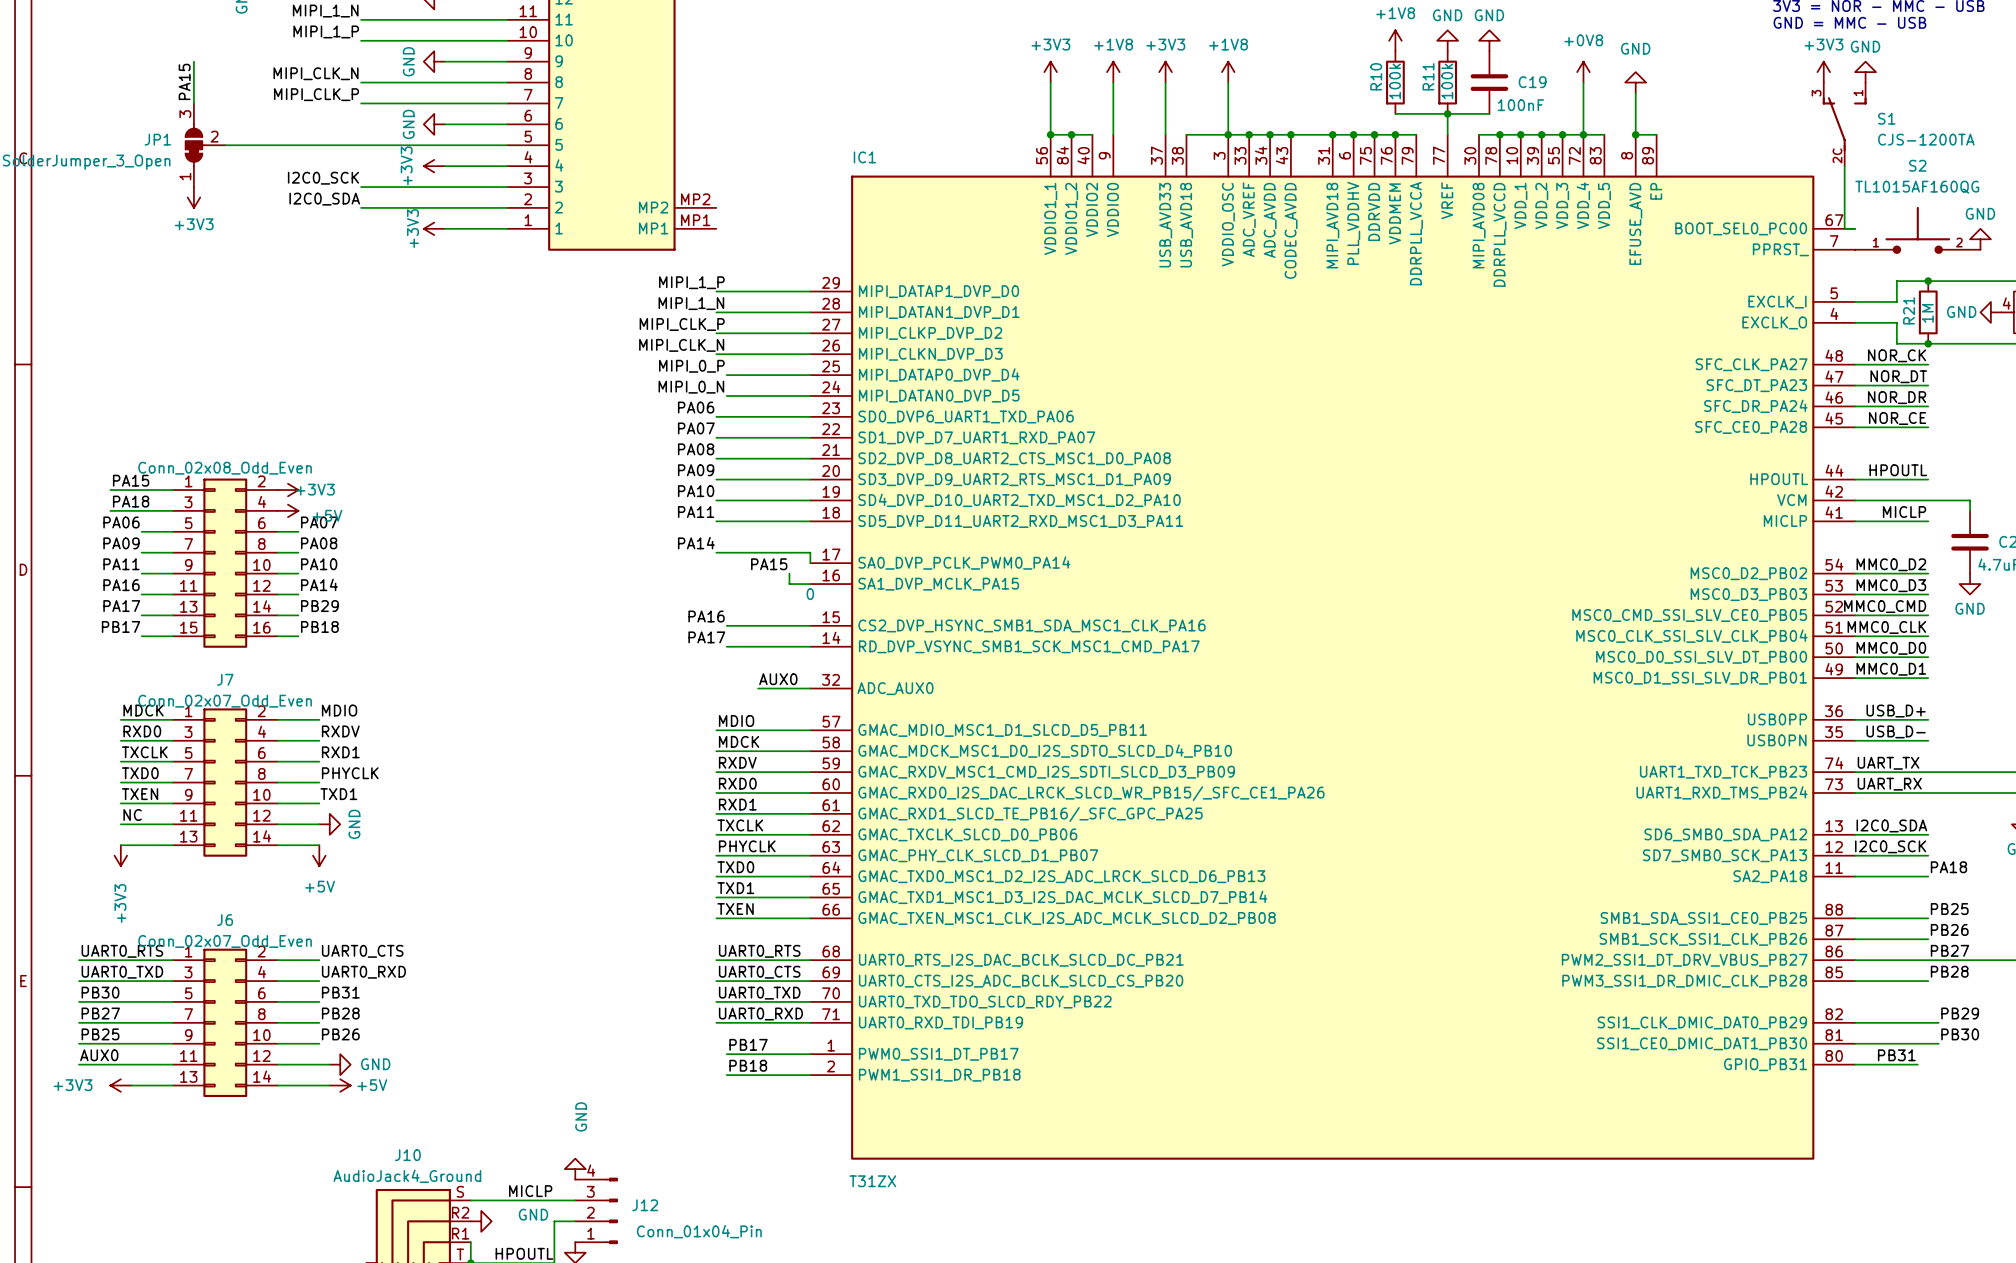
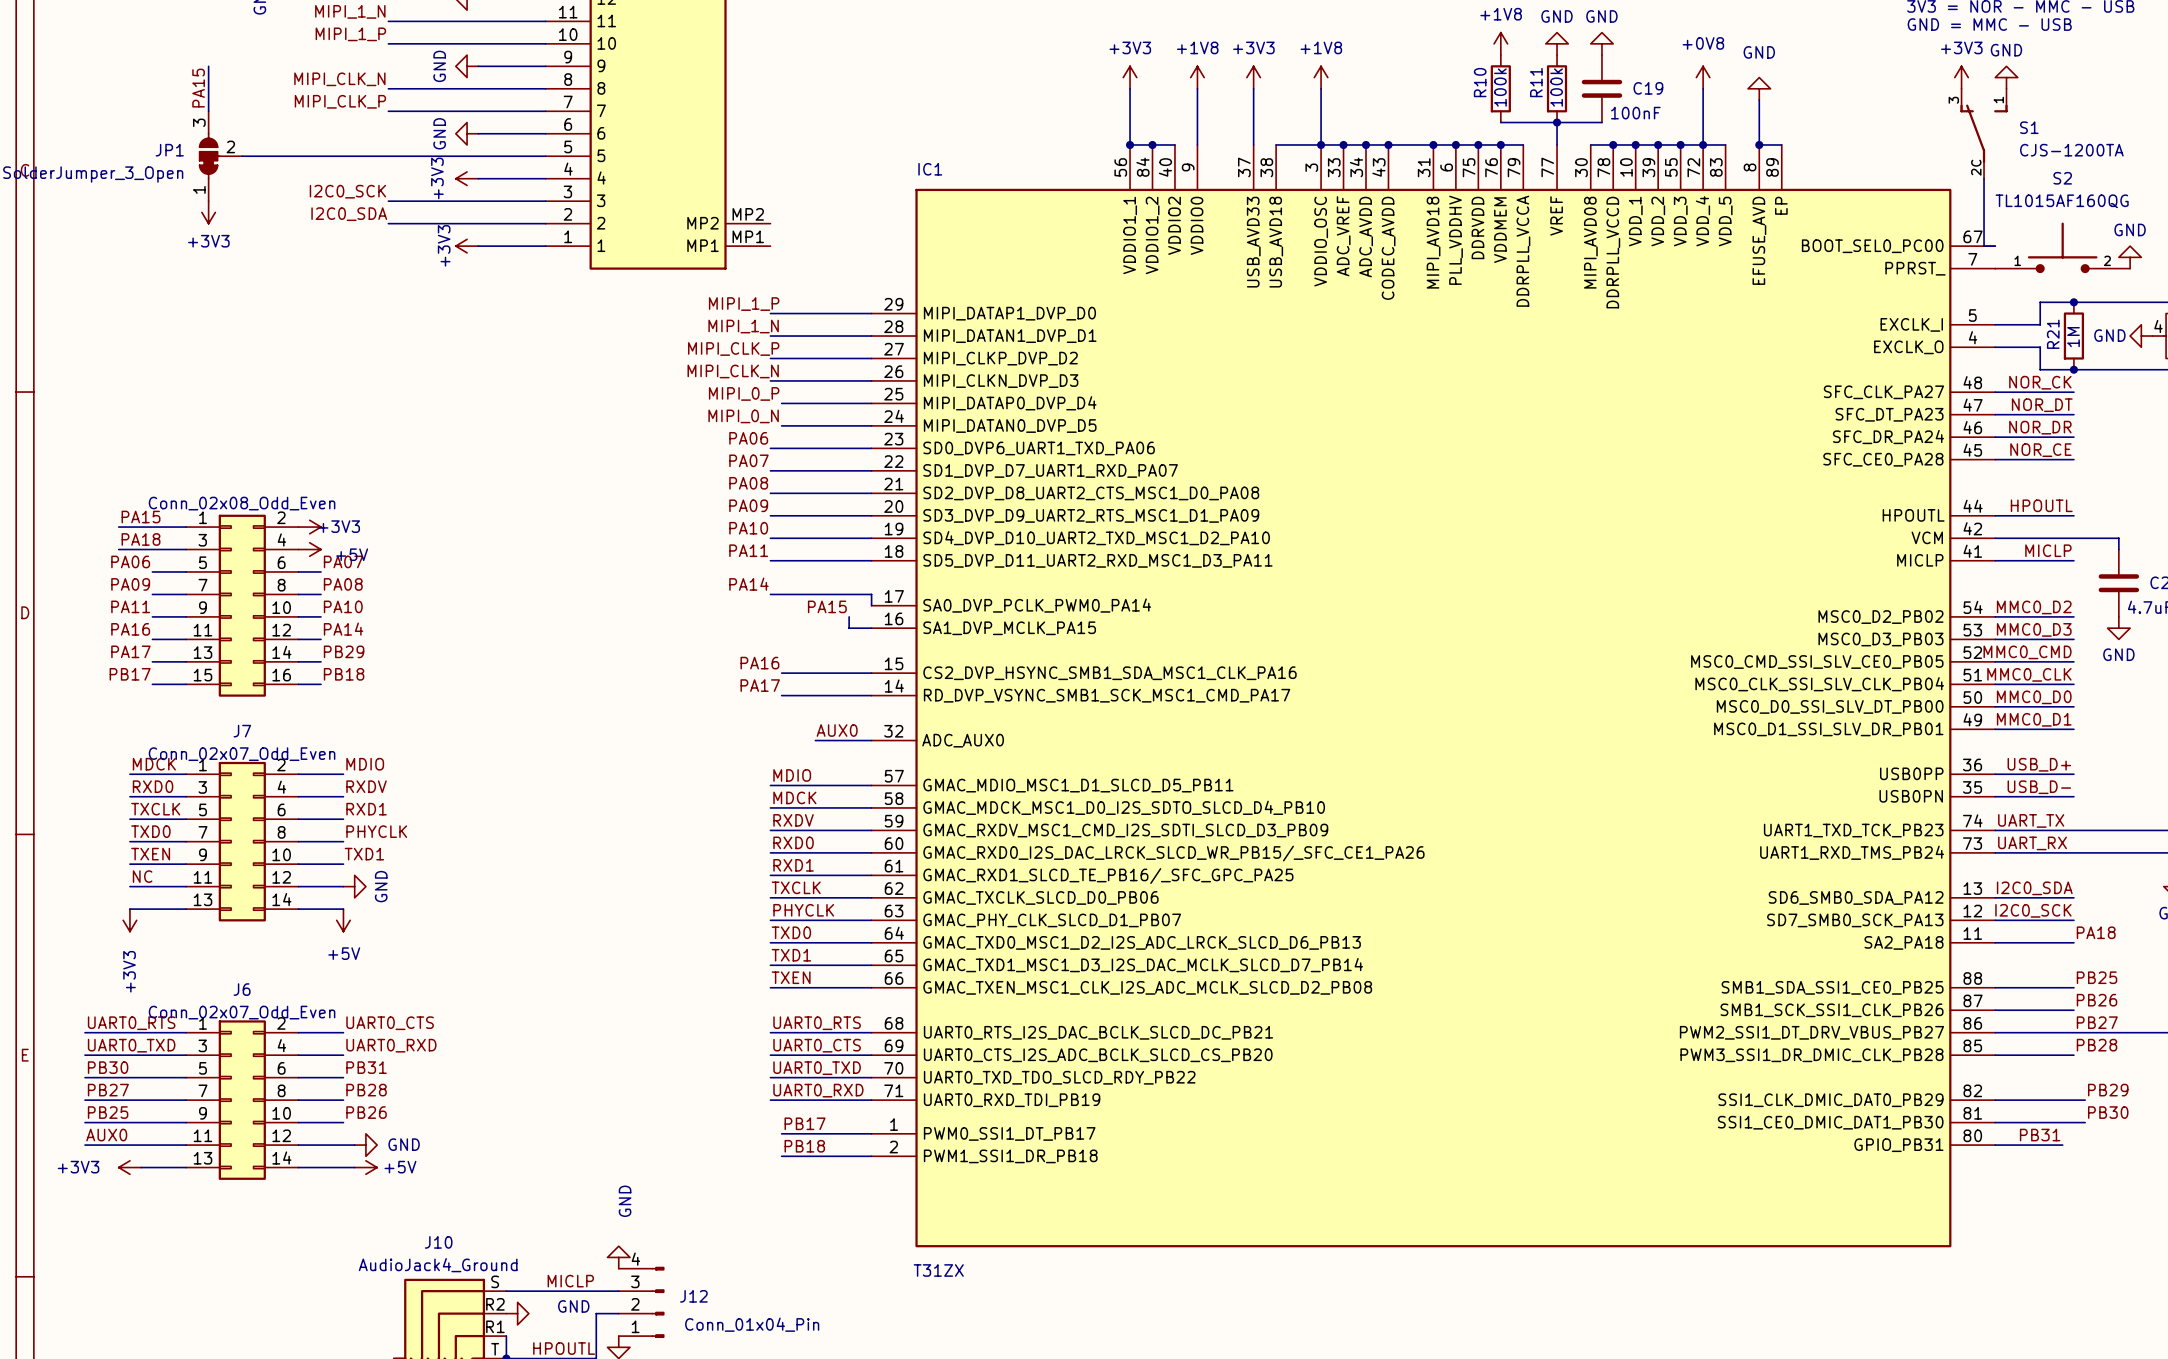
IC1 text: 0 (810, 594) -> none

